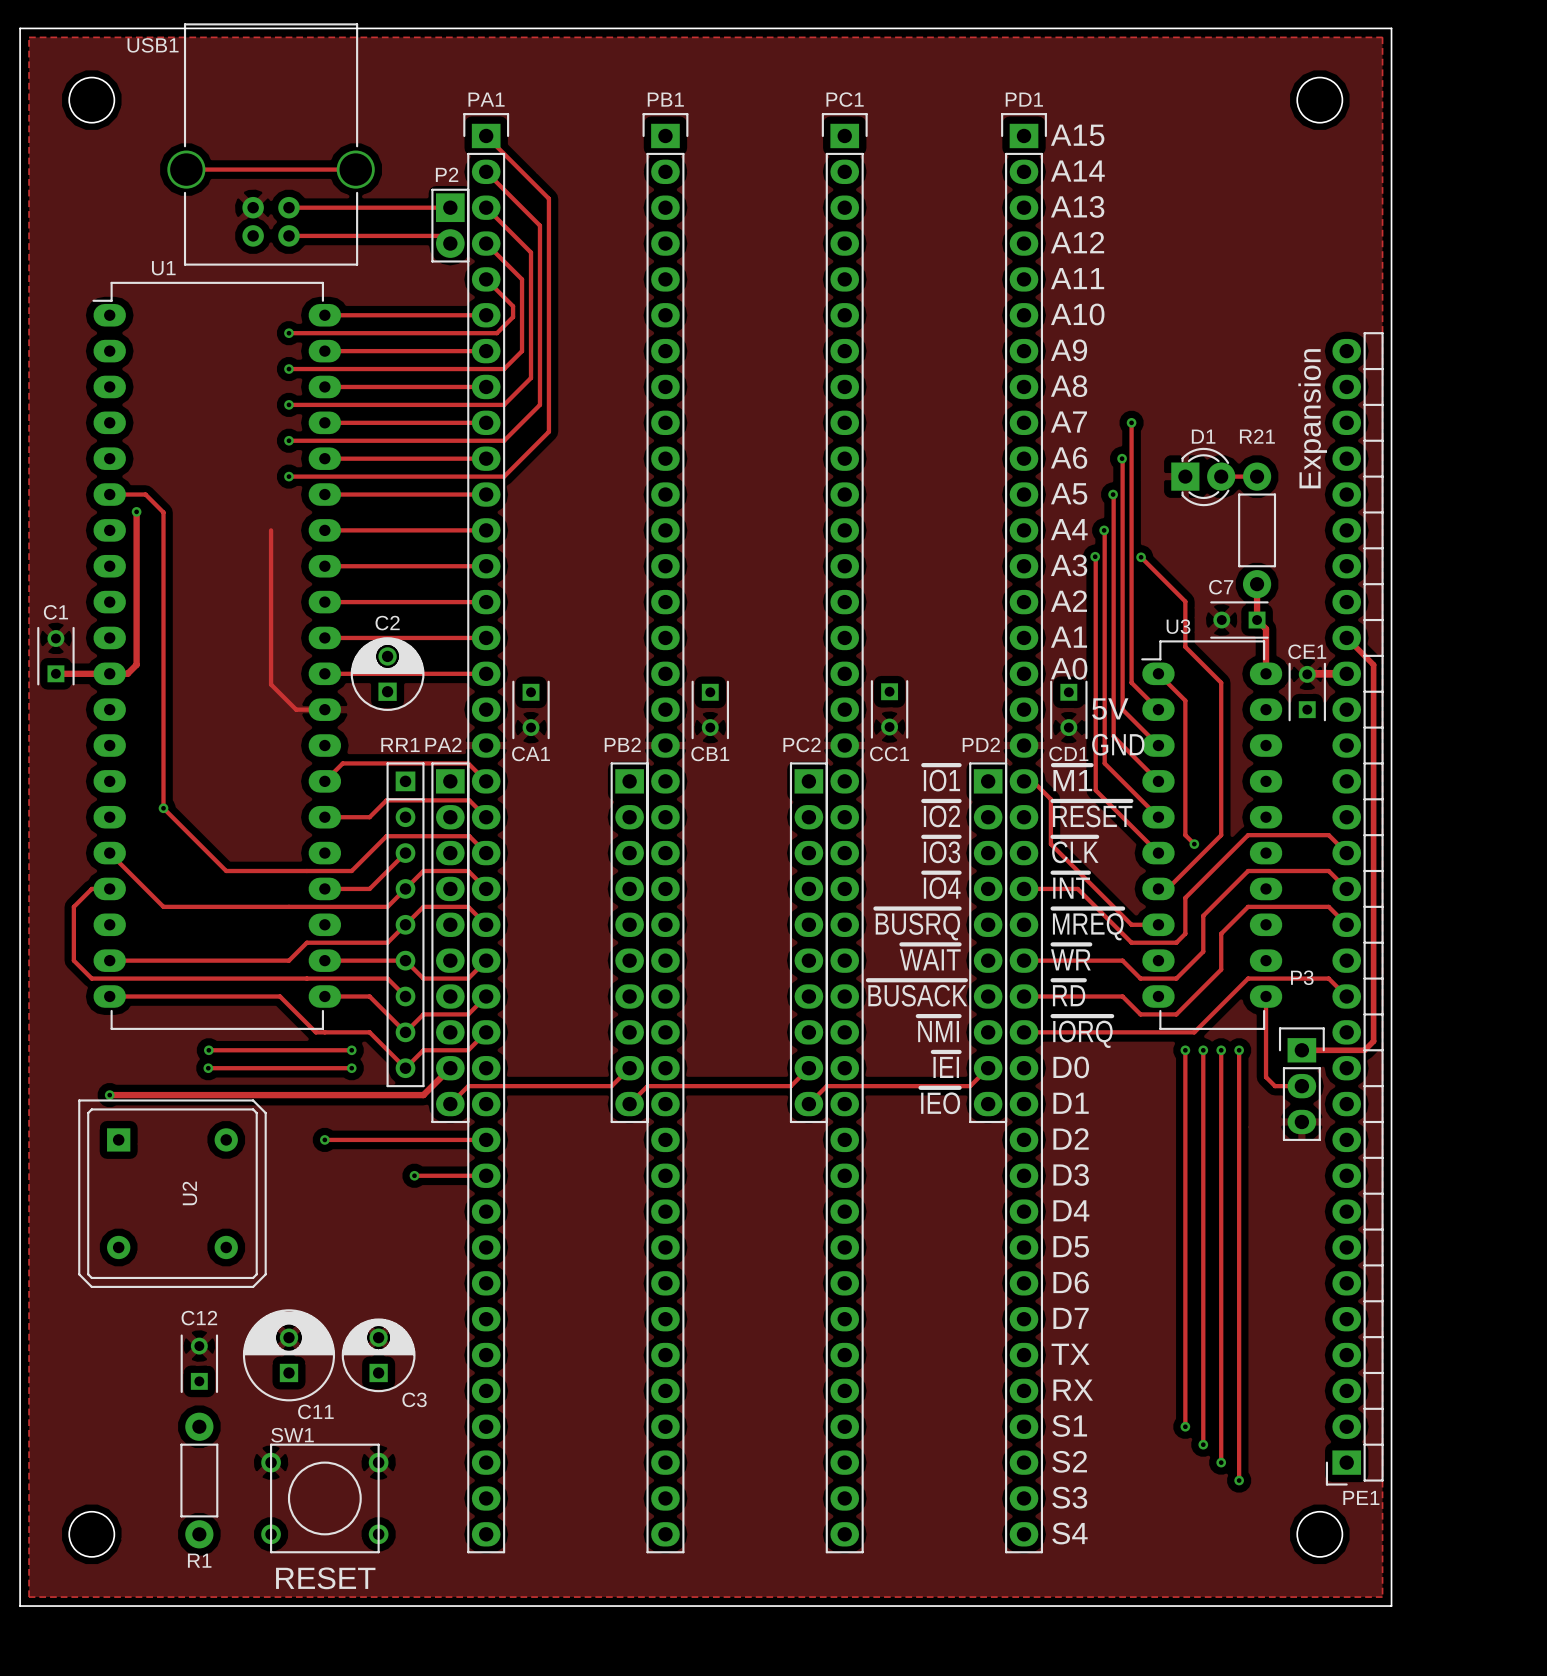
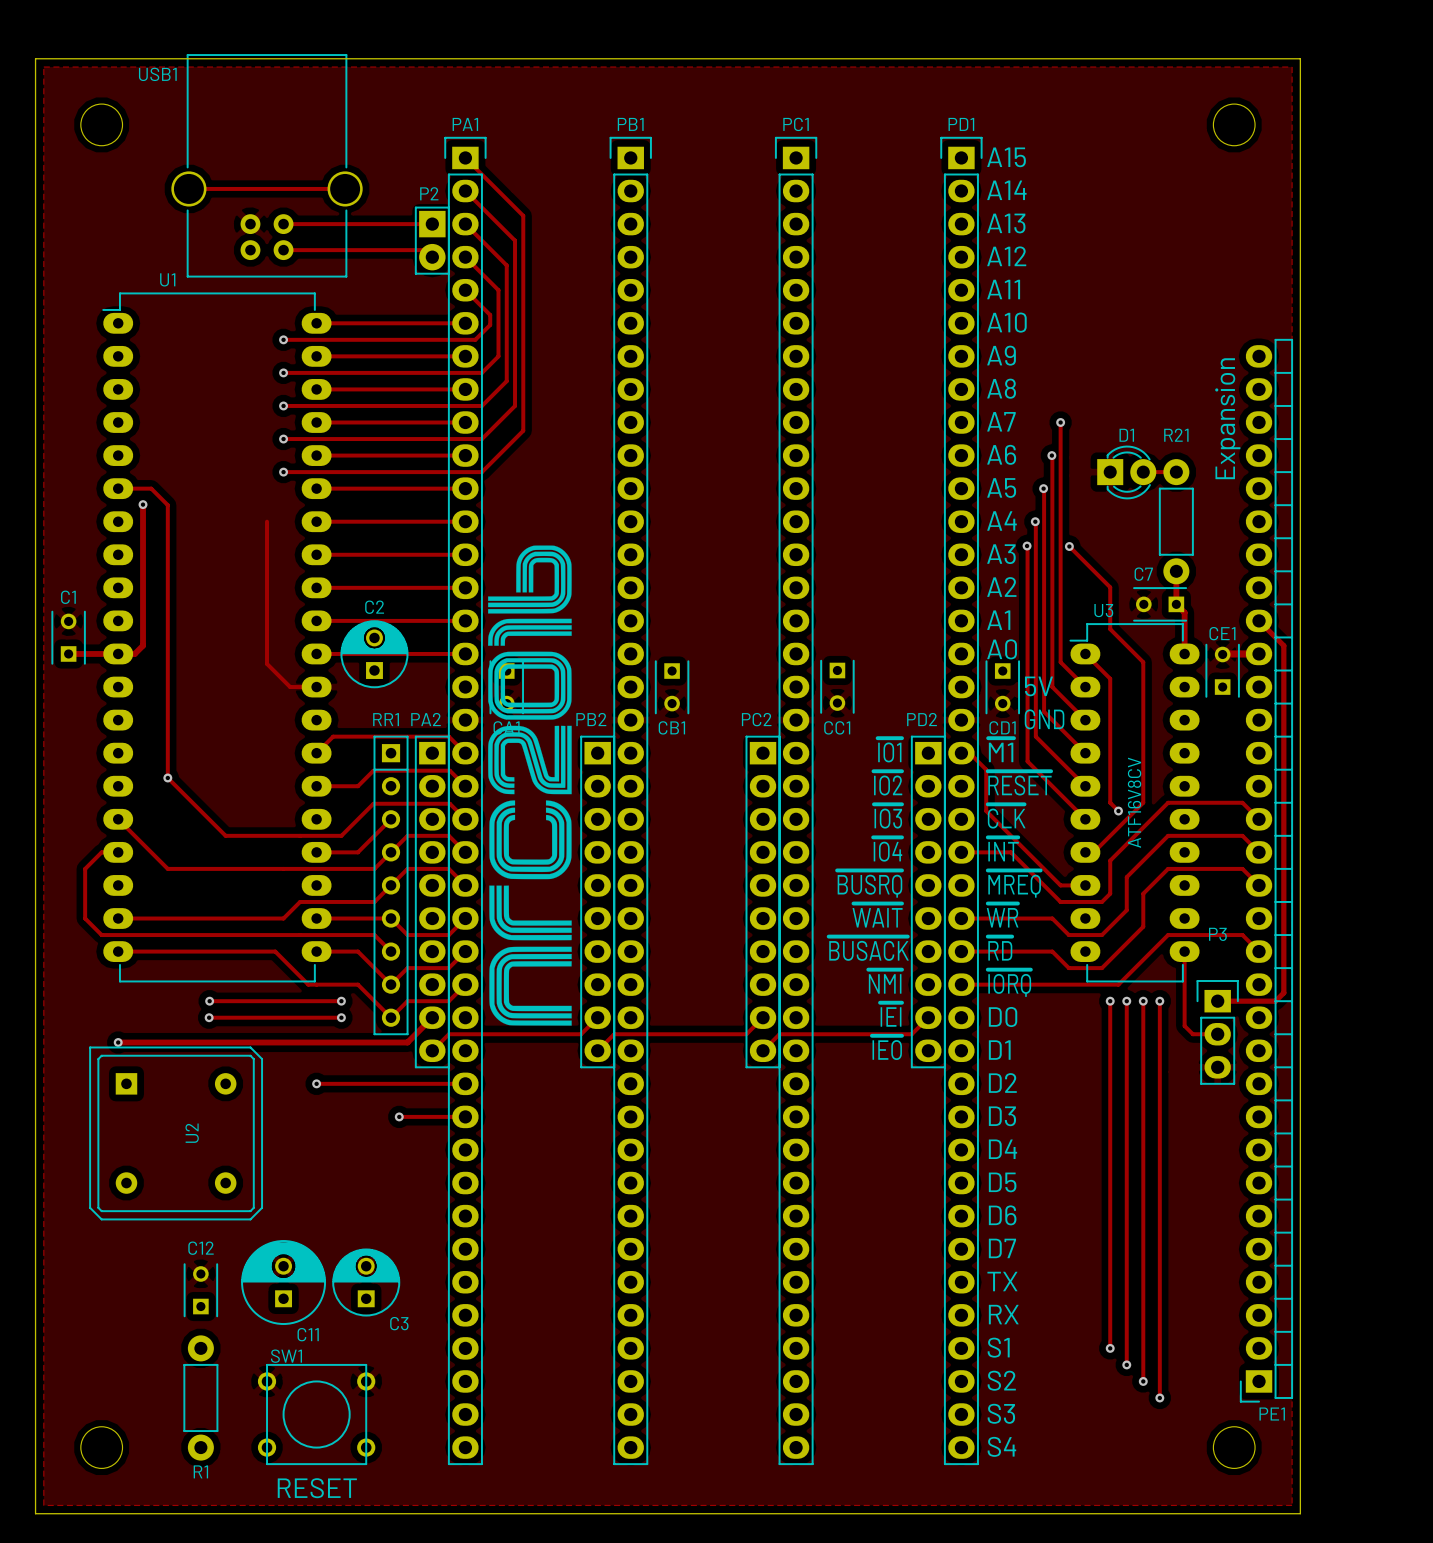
drawing: none -> [488, 545, 572, 1026]
U3 value: none -> ATF16V8CV (1134, 802)

